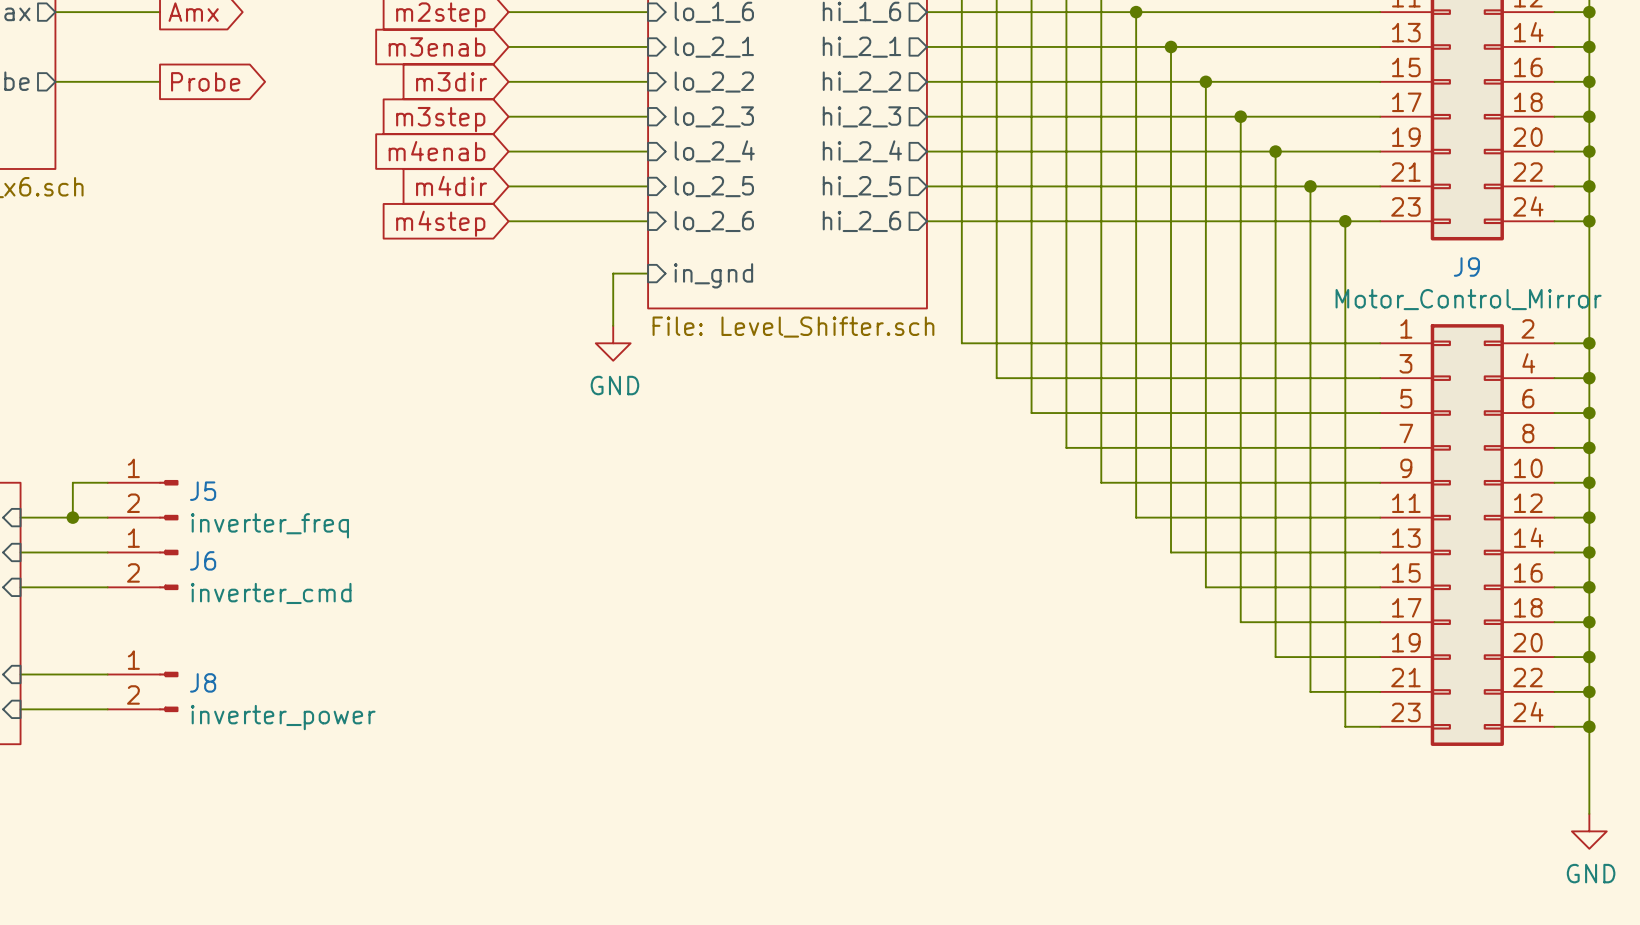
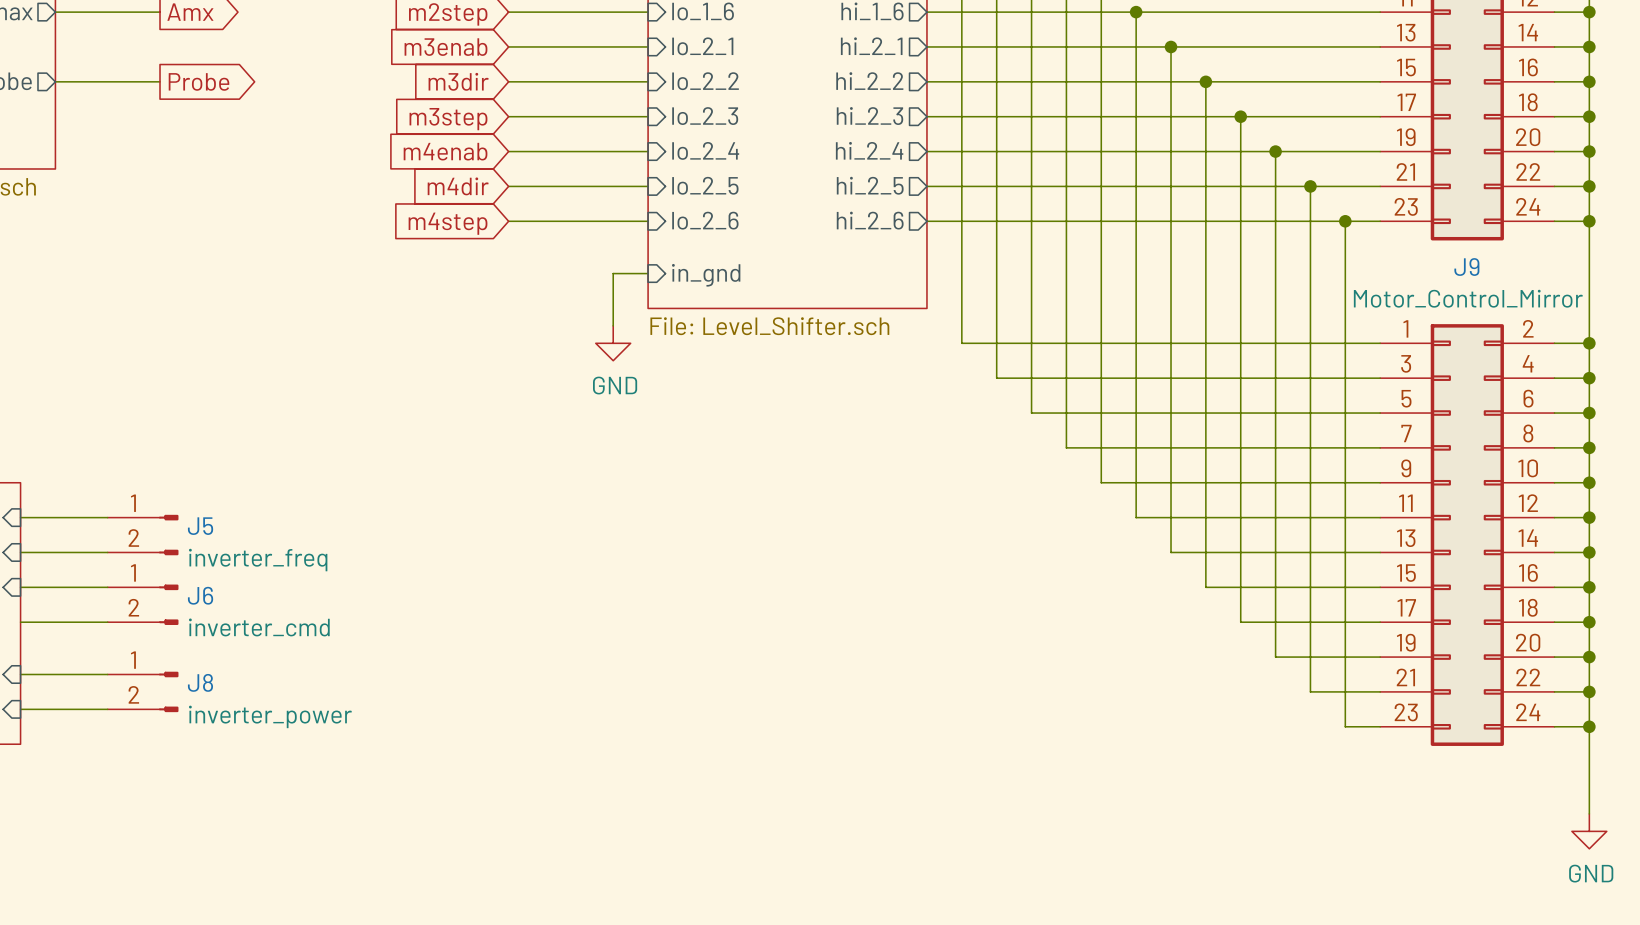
wire: (107, 482) (72, 482) (72, 517) -> none
J5 position: (143, 500) -> (143, 535)
junction: (72, 517) -> none
J6 position: (143, 569) -> (143, 604)
wire: none -> (20, 622) (107, 622)

